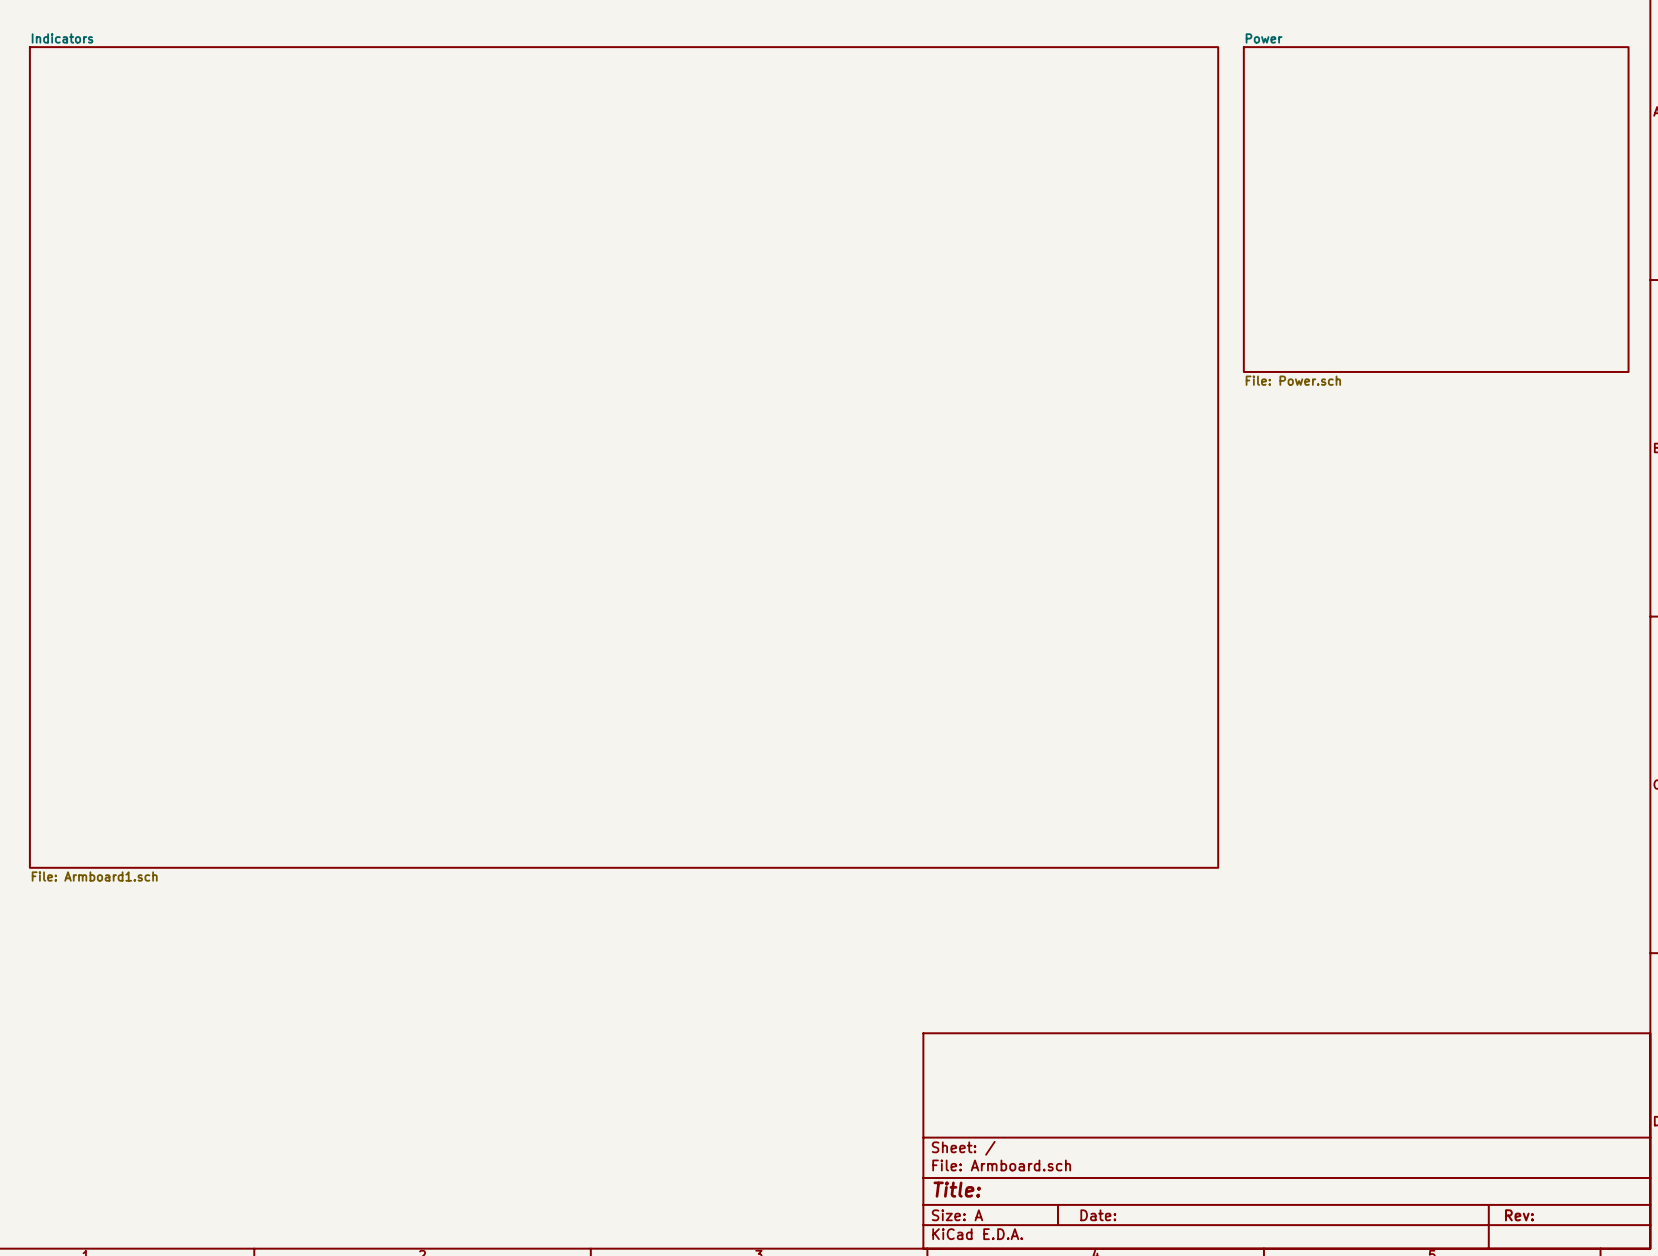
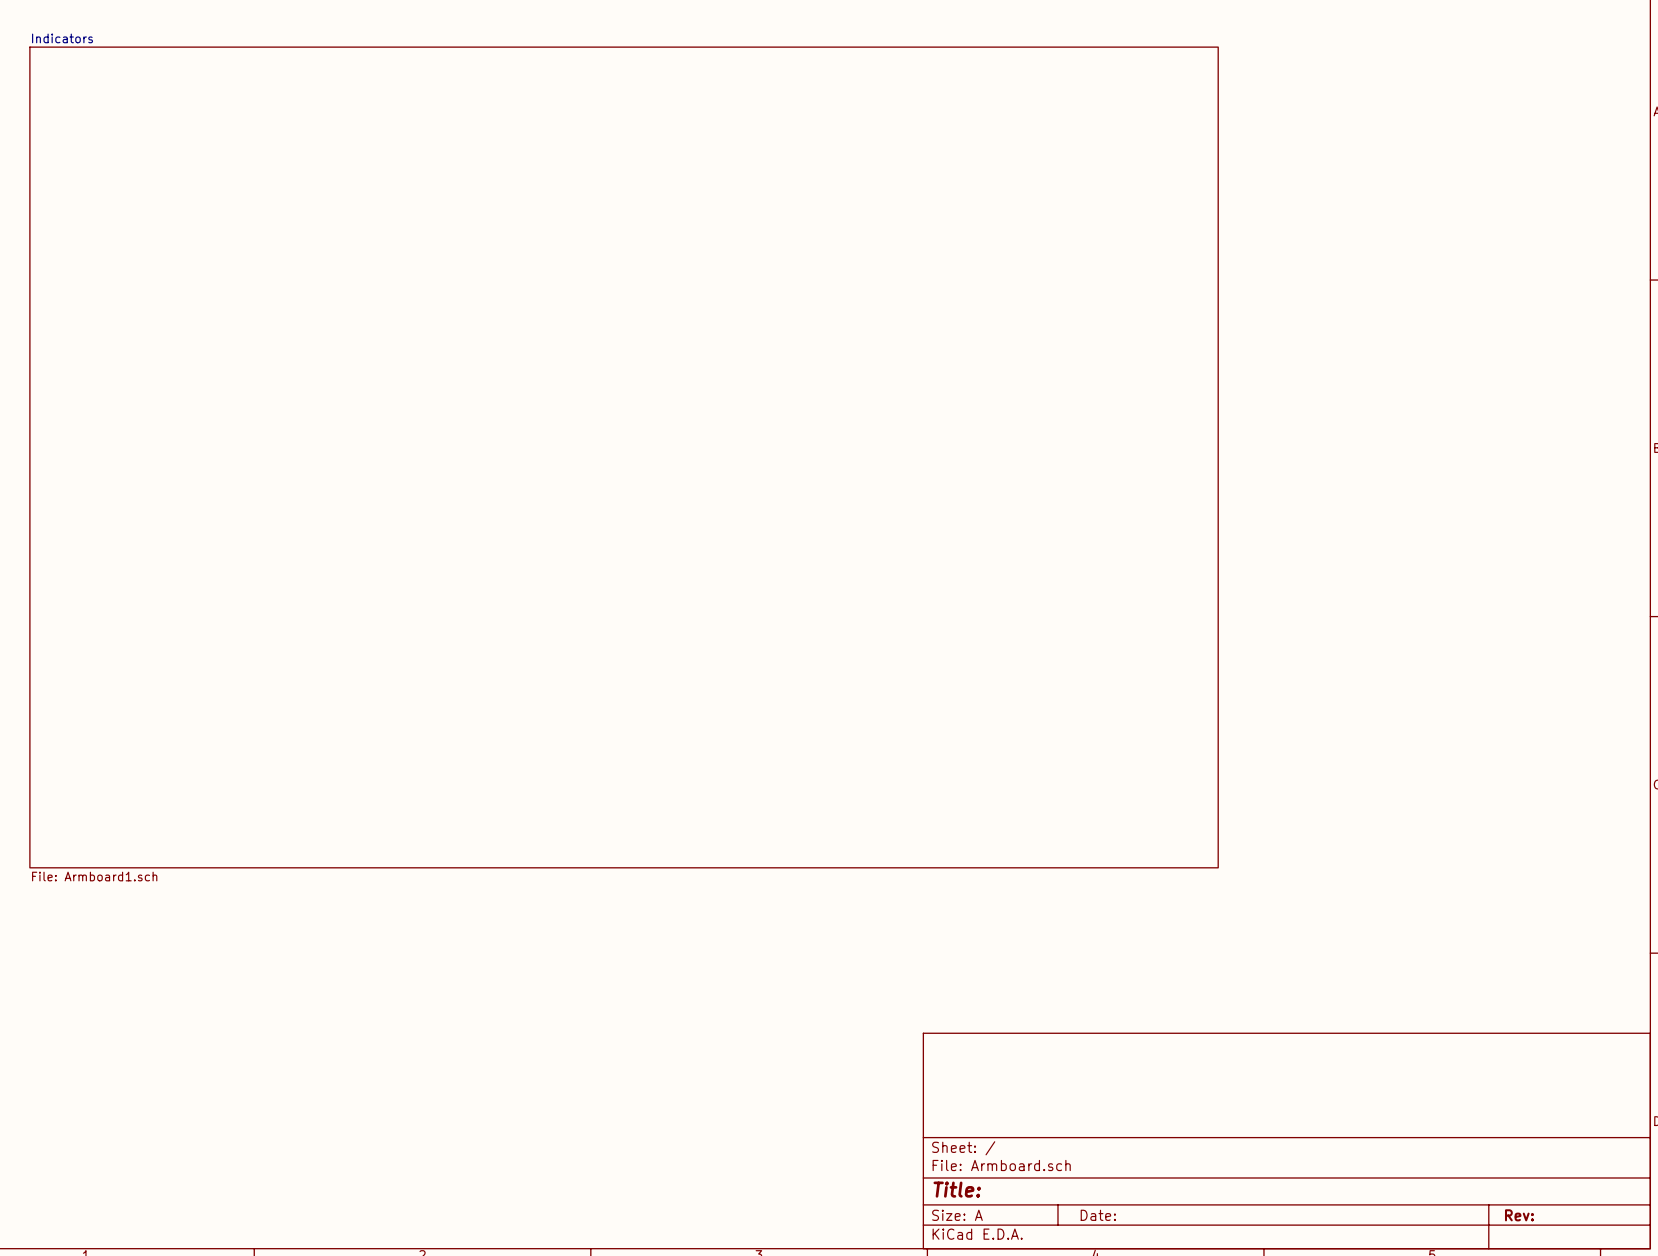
sheet Power: File: Power.sch (1436, 209) -> none

